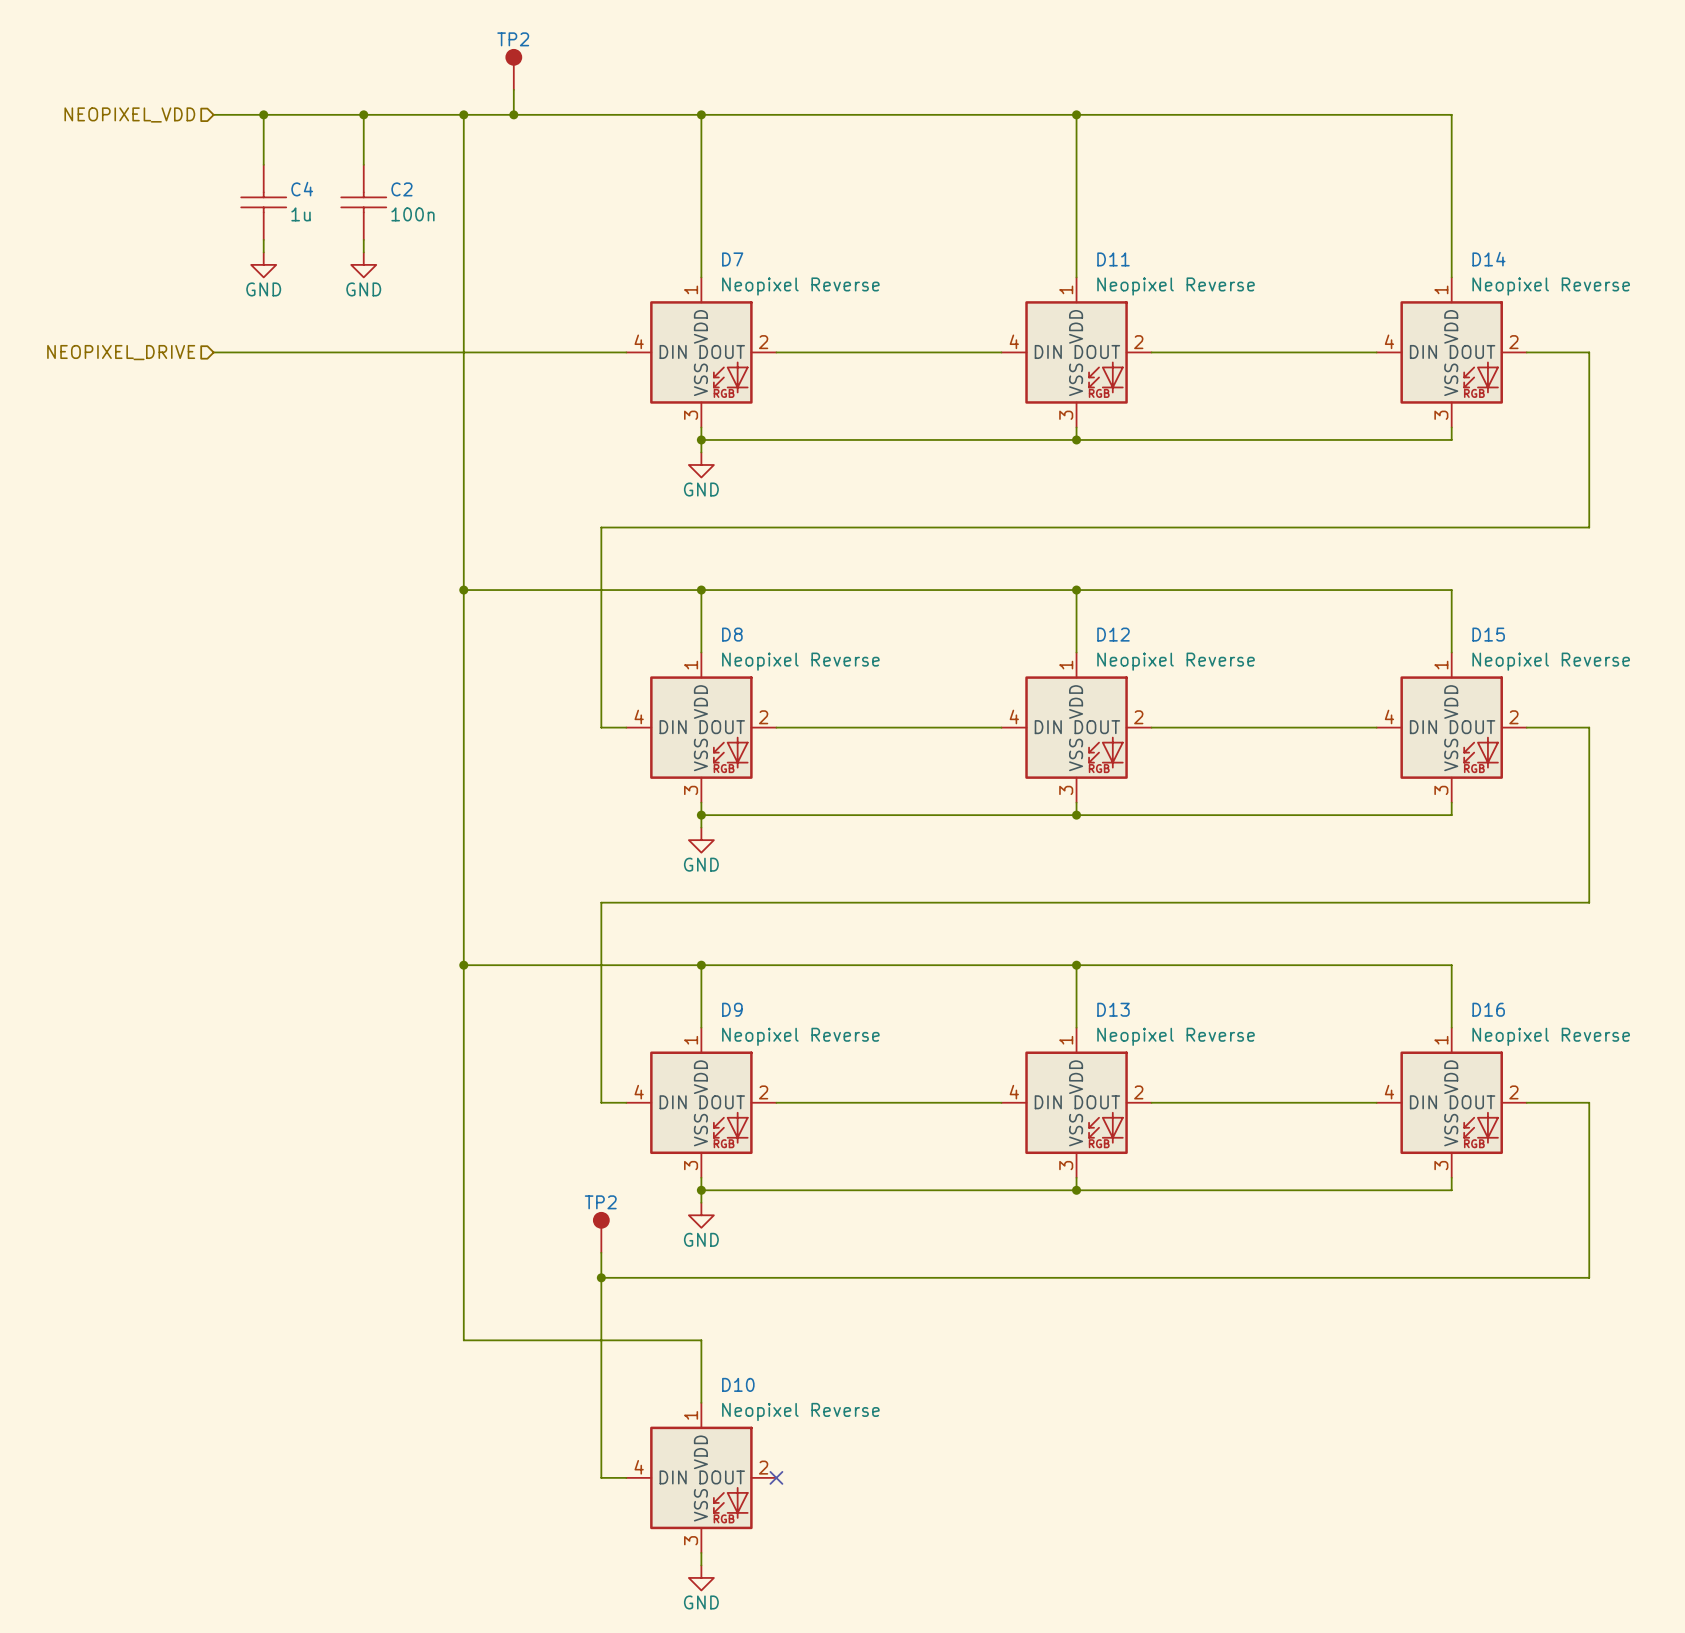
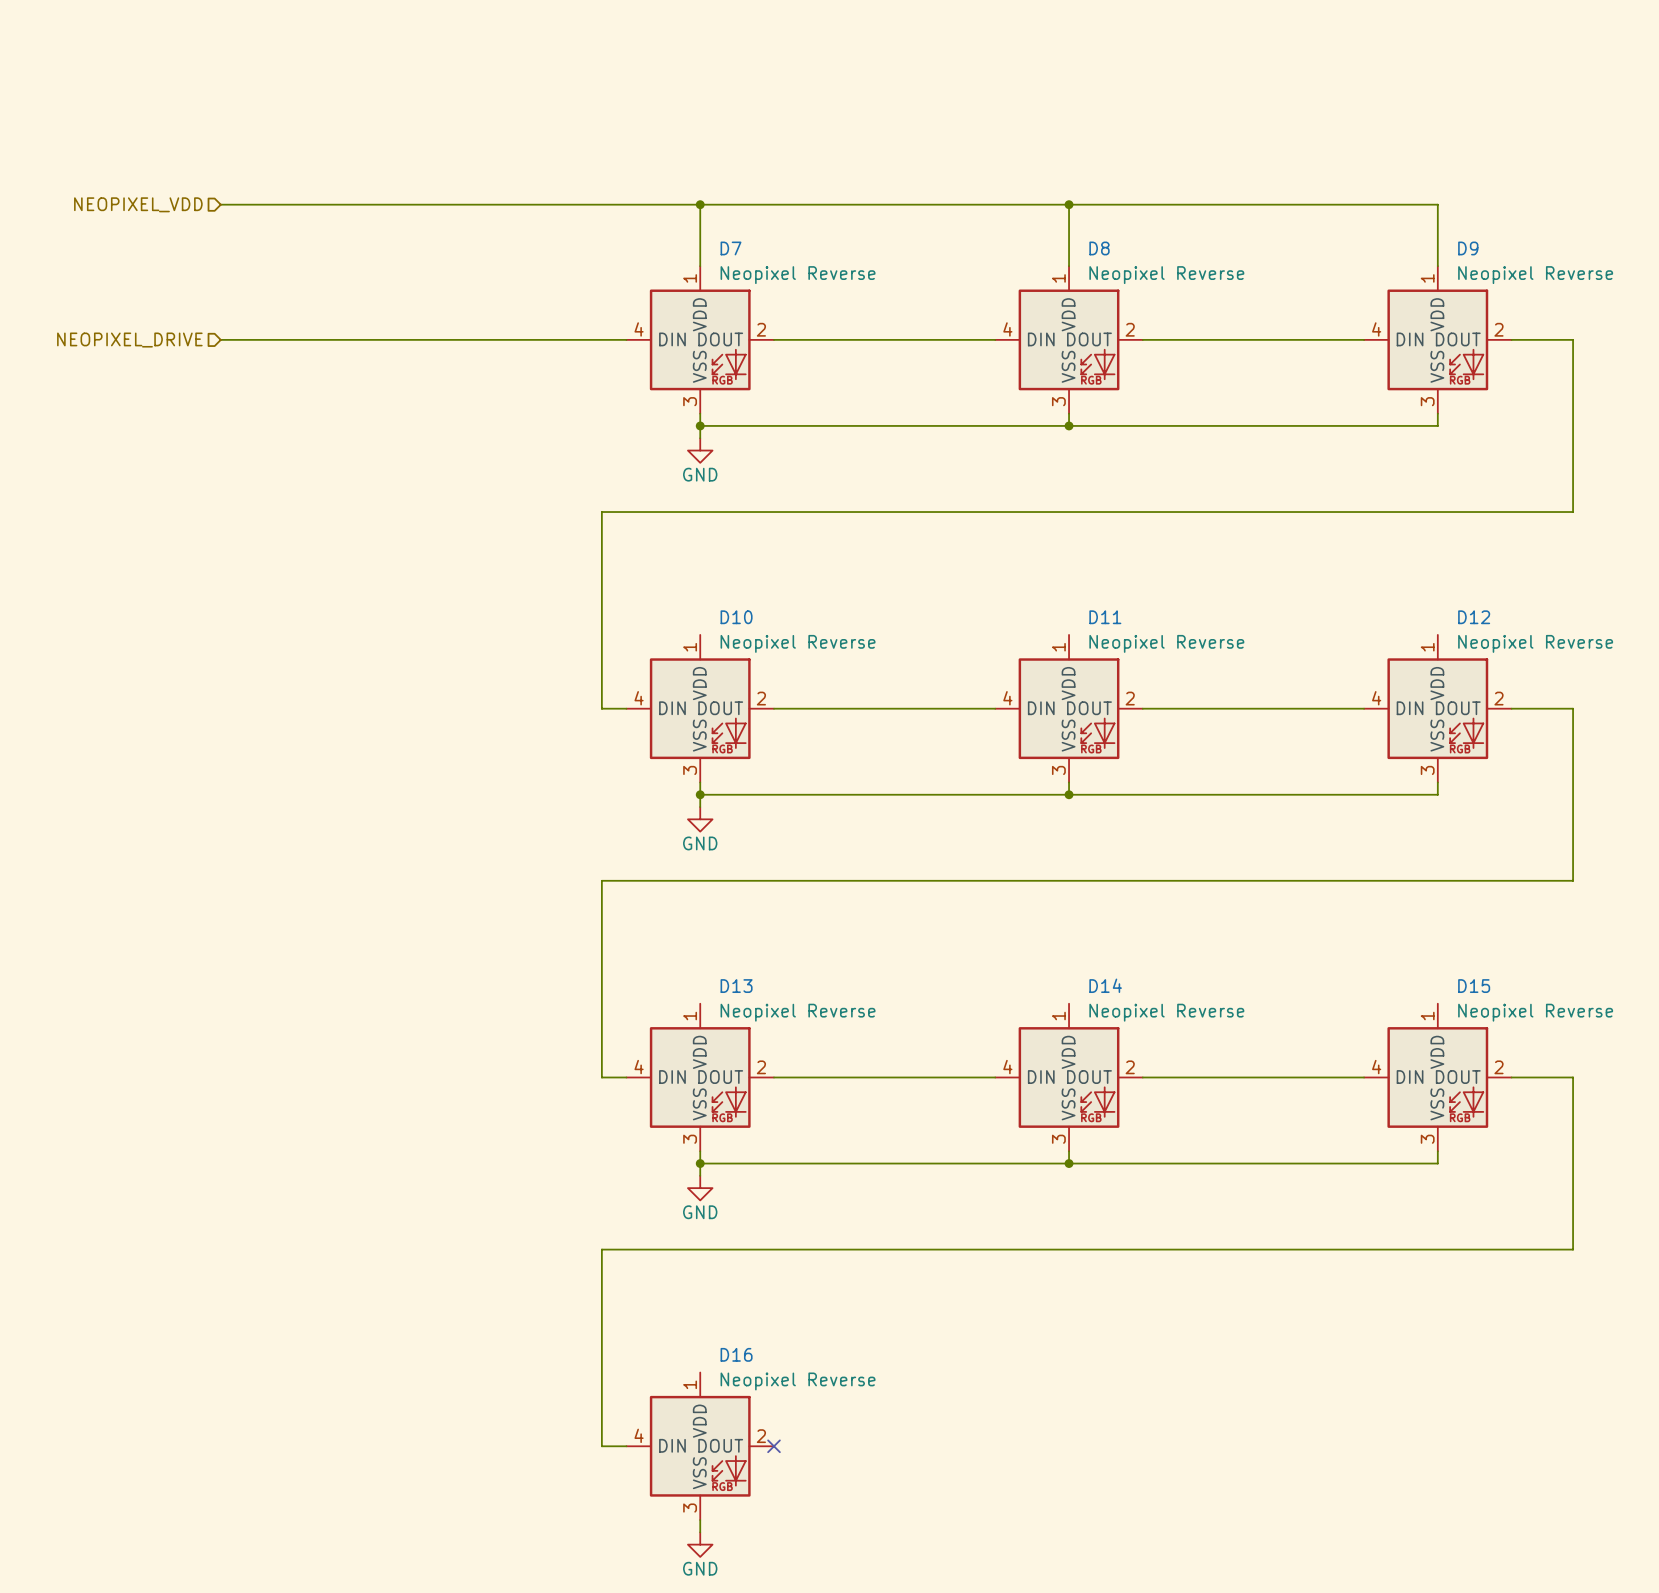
TP2: (513, 69) -> none
wire: (513, 89) (513, 114) -> none
hierarchical label position: NEOPIXEL_VDD (129, 114) -> NEOPIXEL_VDD (138, 204)
wire: (213, 114) (1451, 114) (1451, 214) -> (220, 204) (1437, 204)
wire: (263, 114) (263, 164) -> none
junction: (263, 114) -> none
wire: (363, 114) (363, 164) -> none
junction: (363, 114) -> none
wire: (463, 114) (463, 1340) (701, 1340) (701, 1402) -> none
junction: (463, 114) -> none
junction: (513, 114) -> none
wire: (701, 114) (701, 214) -> none
junction: (701, 114) -> none
wire: (1076, 114) (1076, 214) -> none
junction: (1076, 114) -> none
C4: (263, 202) -> none
C2: 100n (363, 202) -> none
junction: none -> (700, 204)
junction: none -> (1069, 204)
wire: (263, 239) (263, 252) -> none
wire: (363, 239) (363, 252) -> none
D11 name: D11 (1113, 259) -> D8 (1099, 248)
D14 name: D14 (1488, 259) -> D9 (1468, 248)
power symbol: GND (263, 264) -> none
power symbol: GND (363, 264) -> none
wire: (463, 590) (1451, 590) (1451, 652) -> none
junction: (463, 590) -> none
wire: (701, 590) (701, 652) -> none
junction: (701, 590) -> none
wire: (1076, 590) (1076, 652) -> none
junction: (1076, 590) -> none
D8 name: D8 (732, 634) -> D10 (736, 617)
D12 name: D12 (1113, 634) -> D11 (1105, 617)
D15 name: D15 (1488, 634) -> D12 (1474, 617)
wire: (463, 965) (1451, 965) (1451, 1027) -> none
junction: (463, 965) -> none
wire: (701, 965) (701, 1027) -> none
junction: (701, 965) -> none
wire: (1076, 965) (1076, 1027) -> none
junction: (1076, 965) -> none
D9 name: D9 (732, 1009) -> D13 (736, 986)
D13 name: D13 (1113, 1009) -> D14 (1105, 985)
D16 name: D16 (1488, 1009) -> D15 (1474, 986)
TP2: (601, 1232) -> none
wire: (601, 1252) (601, 1277) -> none
junction: (601, 1277) -> none
D10 name: D10 (738, 1384) -> D16 (736, 1354)

